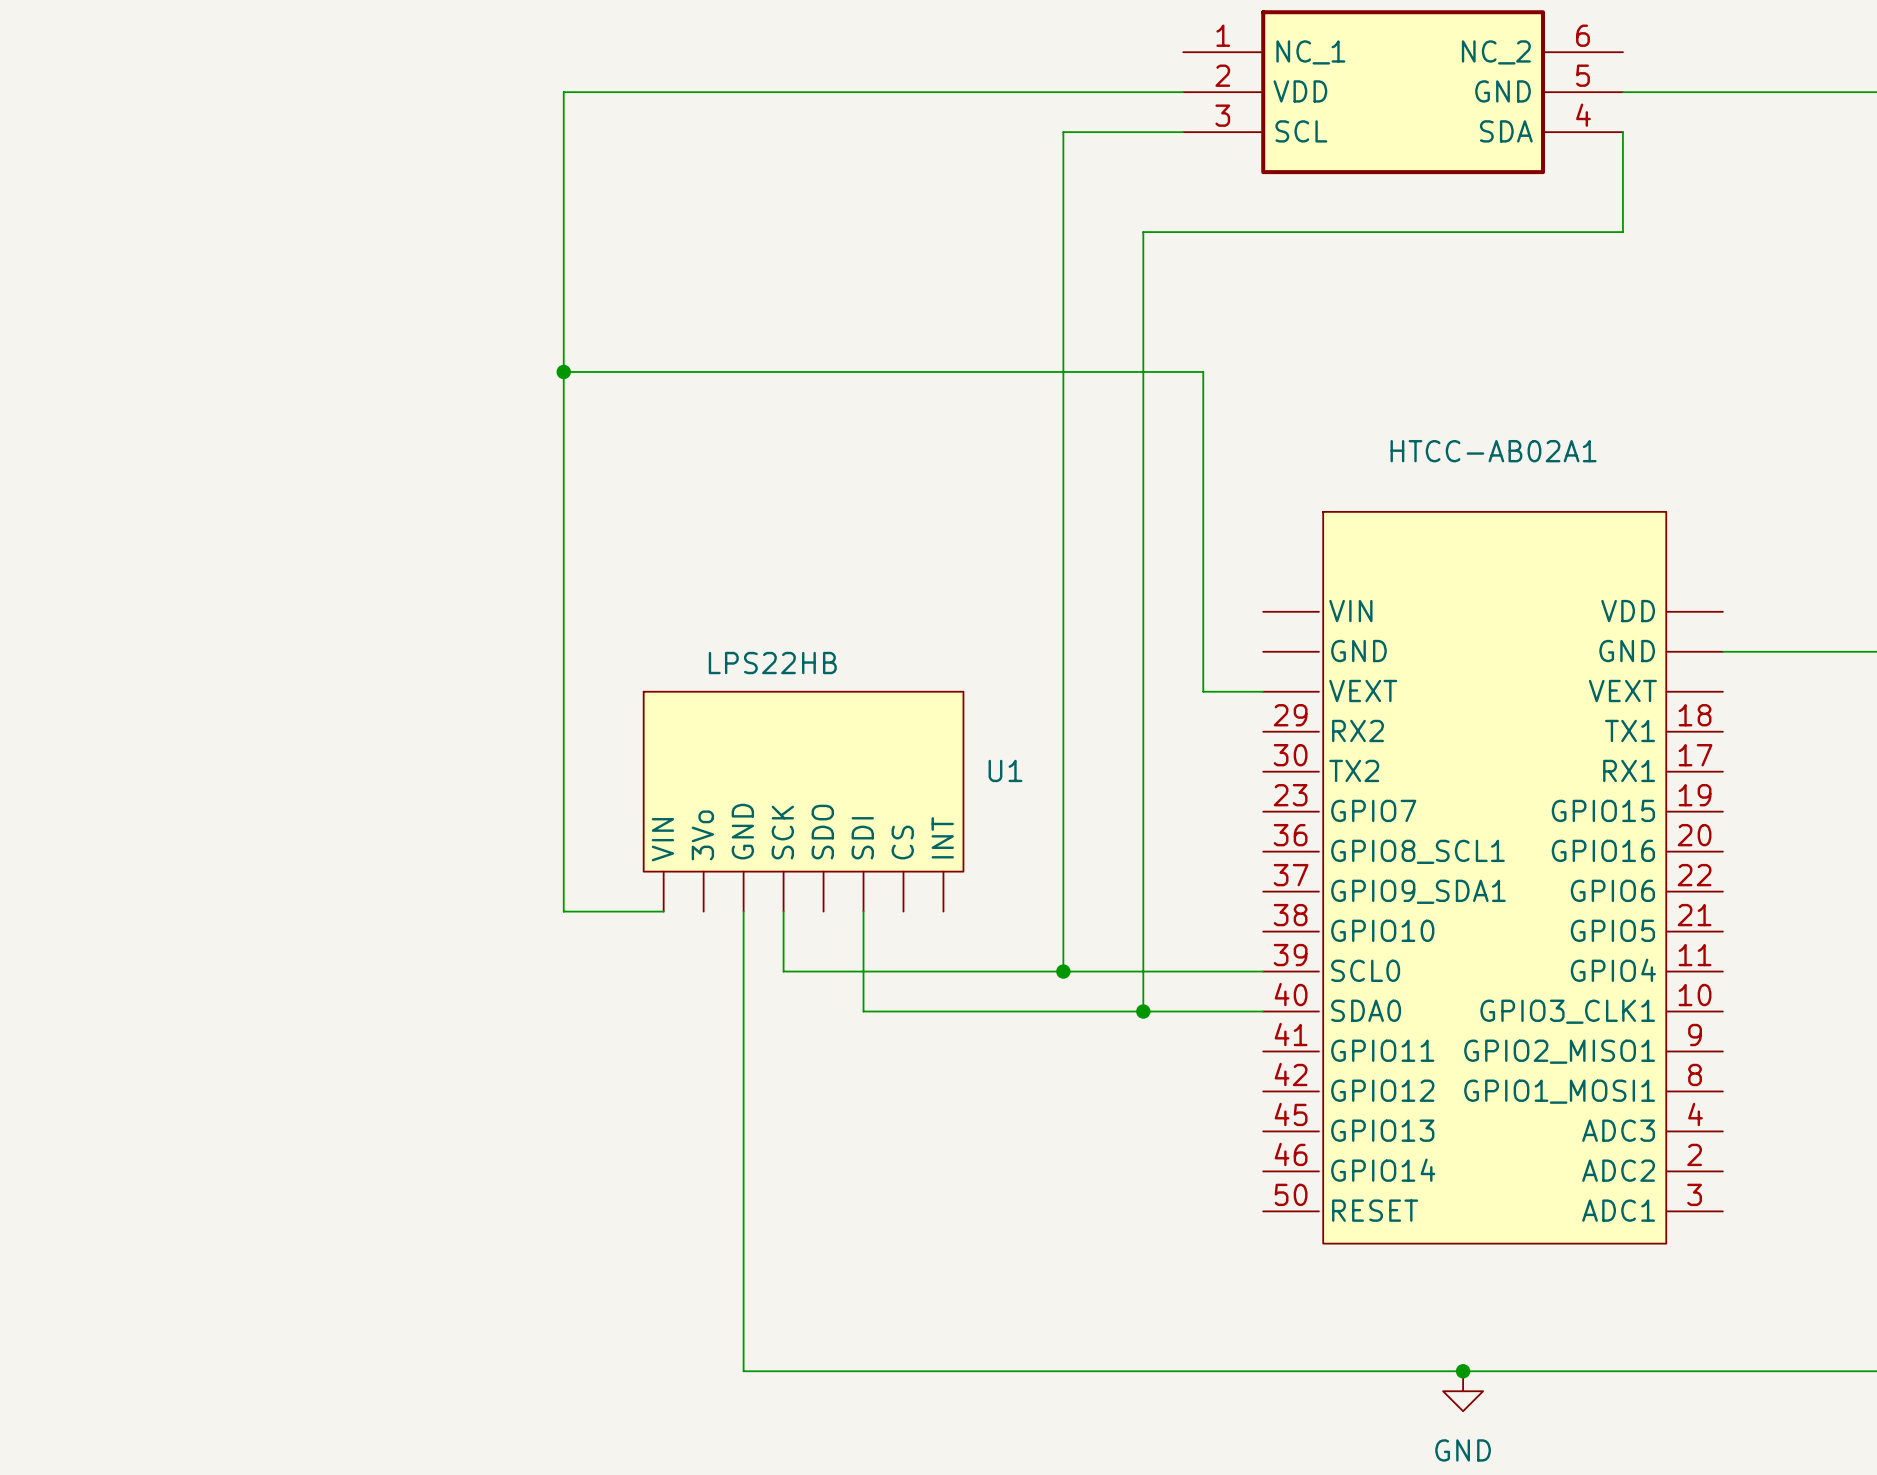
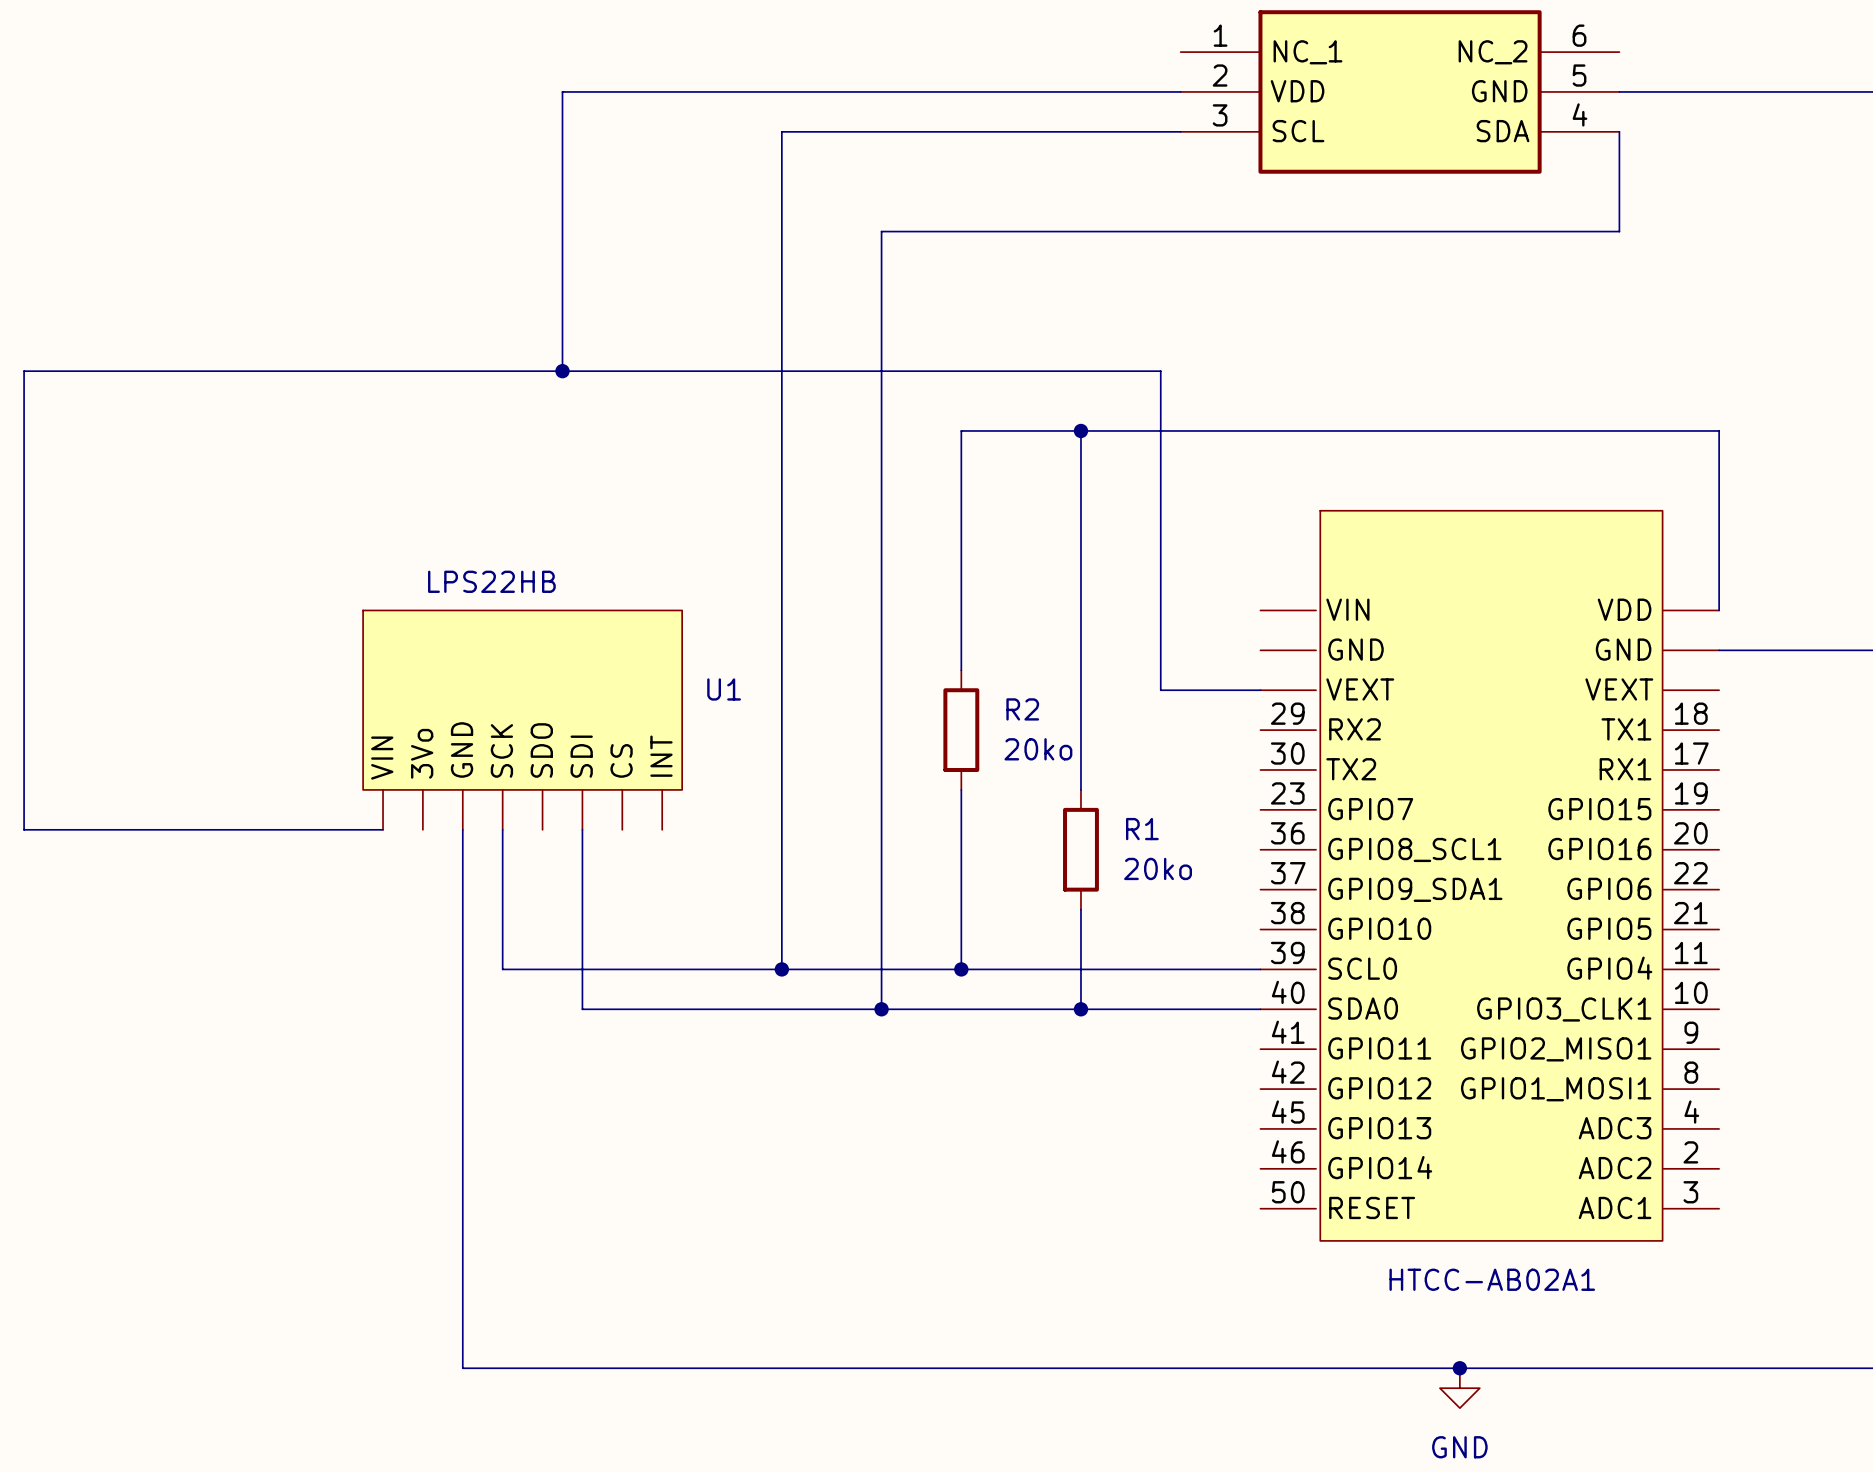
wire: (1063, 132) (1063, 971) -> (1061, 131) (781, 131) (781, 909)
wire: (1143, 232) (1143, 1011) -> (1140, 231) (881, 231) (881, 1009)
wire: (563, 371) (563, 911) (663, 911) -> (562, 371) (24, 371) (24, 829) (383, 829)
wire: (1163, 371) (1203, 371) (1203, 691) -> (1160, 371) (1160, 690) (1200, 690)
wire: none -> (1080, 430) (1080, 789)
junction: none -> (1080, 430)
HTCC-AB02A1 name position: HTCC-AB02A1 (1493, 451) -> HTCC-AB02A1 (1492, 1279)
wire: none -> (1719, 610) (1719, 430) (961, 430) (961, 670)
R2: none -> 20ko (961, 730)
wire: none -> (961, 789) (961, 969)
U1 position: (803, 801) -> (522, 720)
wire: none -> (502, 829) (502, 969) (781, 969)
R1: none -> 20ko (1080, 849)
wire: (743, 911) (743, 1371) -> (462, 829) (462, 1368) (741, 1368)
wire: (863, 911) (863, 1011) -> (582, 829) (582, 1009) (861, 1009)
wire: none -> (1080, 909) (1080, 1009)
junction: none -> (781, 969)
junction: none -> (961, 969)
junction: (1063, 971) -> none
junction: none -> (881, 1009)
junction: none -> (1080, 1009)
junction: (1143, 1011) -> none

